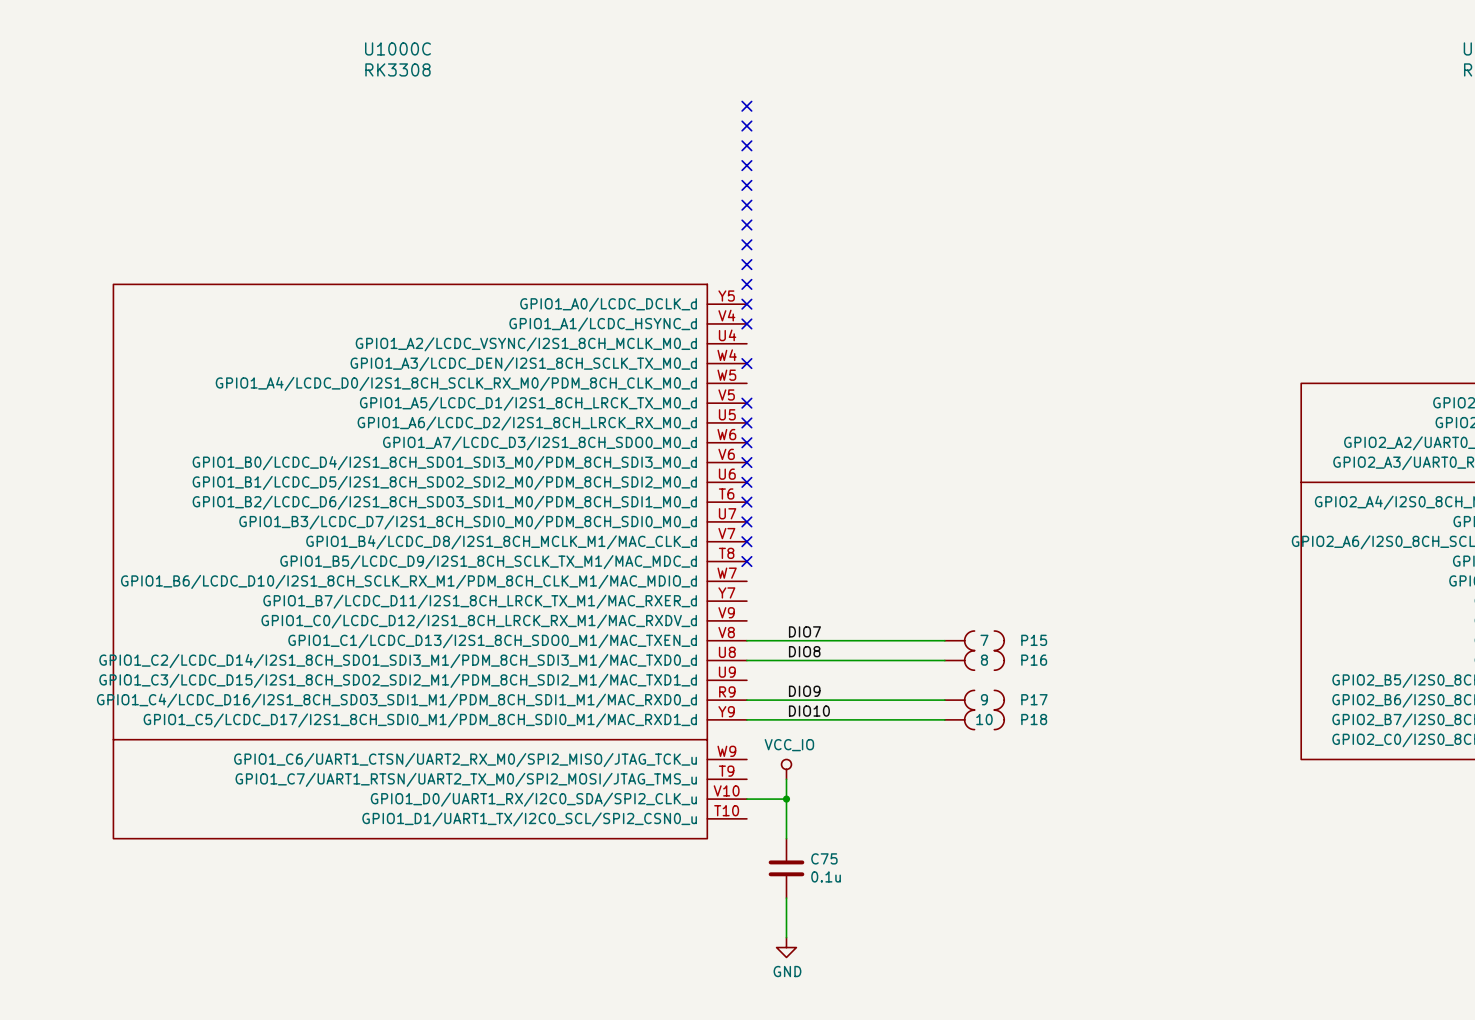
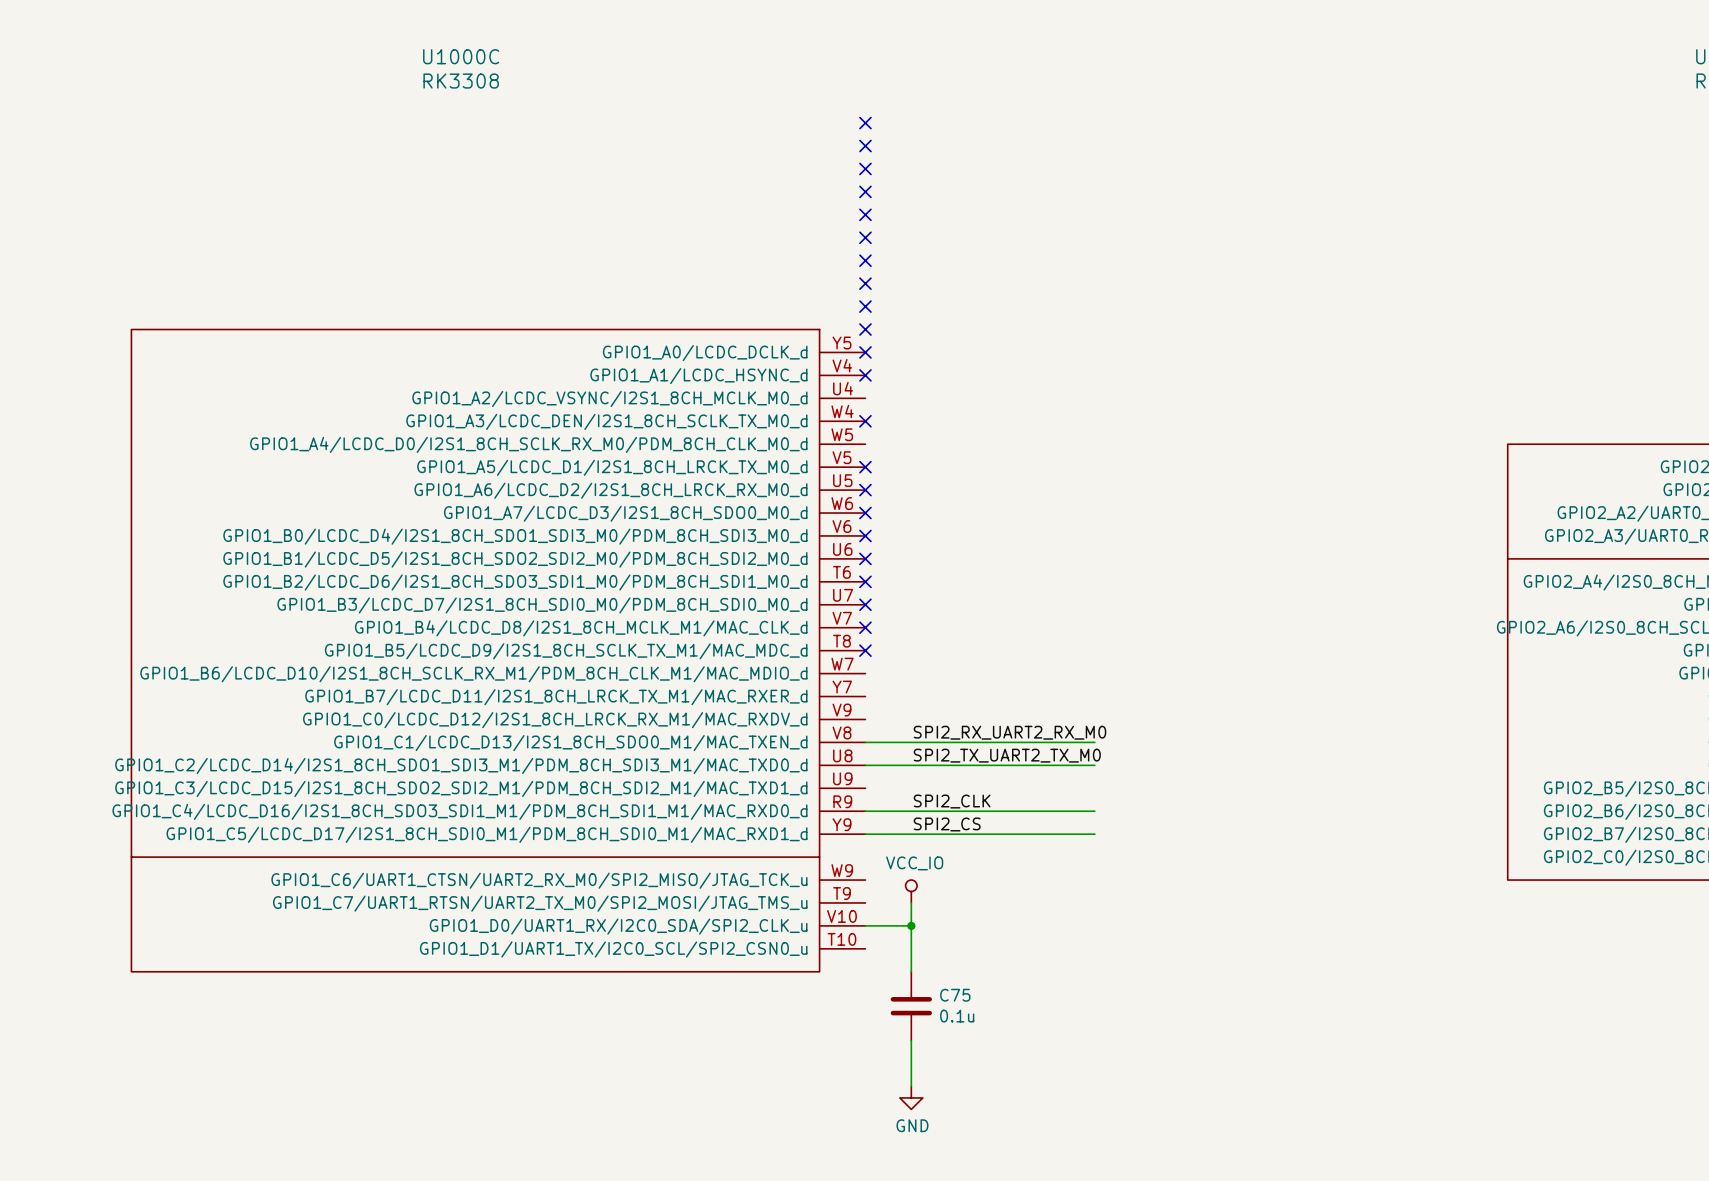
label: DIO7 (804, 631) -> SPI2_RX_UART2_RX_M0 (1010, 732)
P15: 7 (974, 640) -> none
label: DIO8 (804, 651) -> SPI2_TX_UART2_TX_M0 (1007, 755)
P16: 8 (974, 660) -> none
label: DIO9 (804, 691) -> SPI2_CLK (952, 801)
P17: 9 (974, 700) -> none
label: DIO10 (809, 711) -> SPI2_CS (947, 824)
P18: 10 (974, 719) -> none

